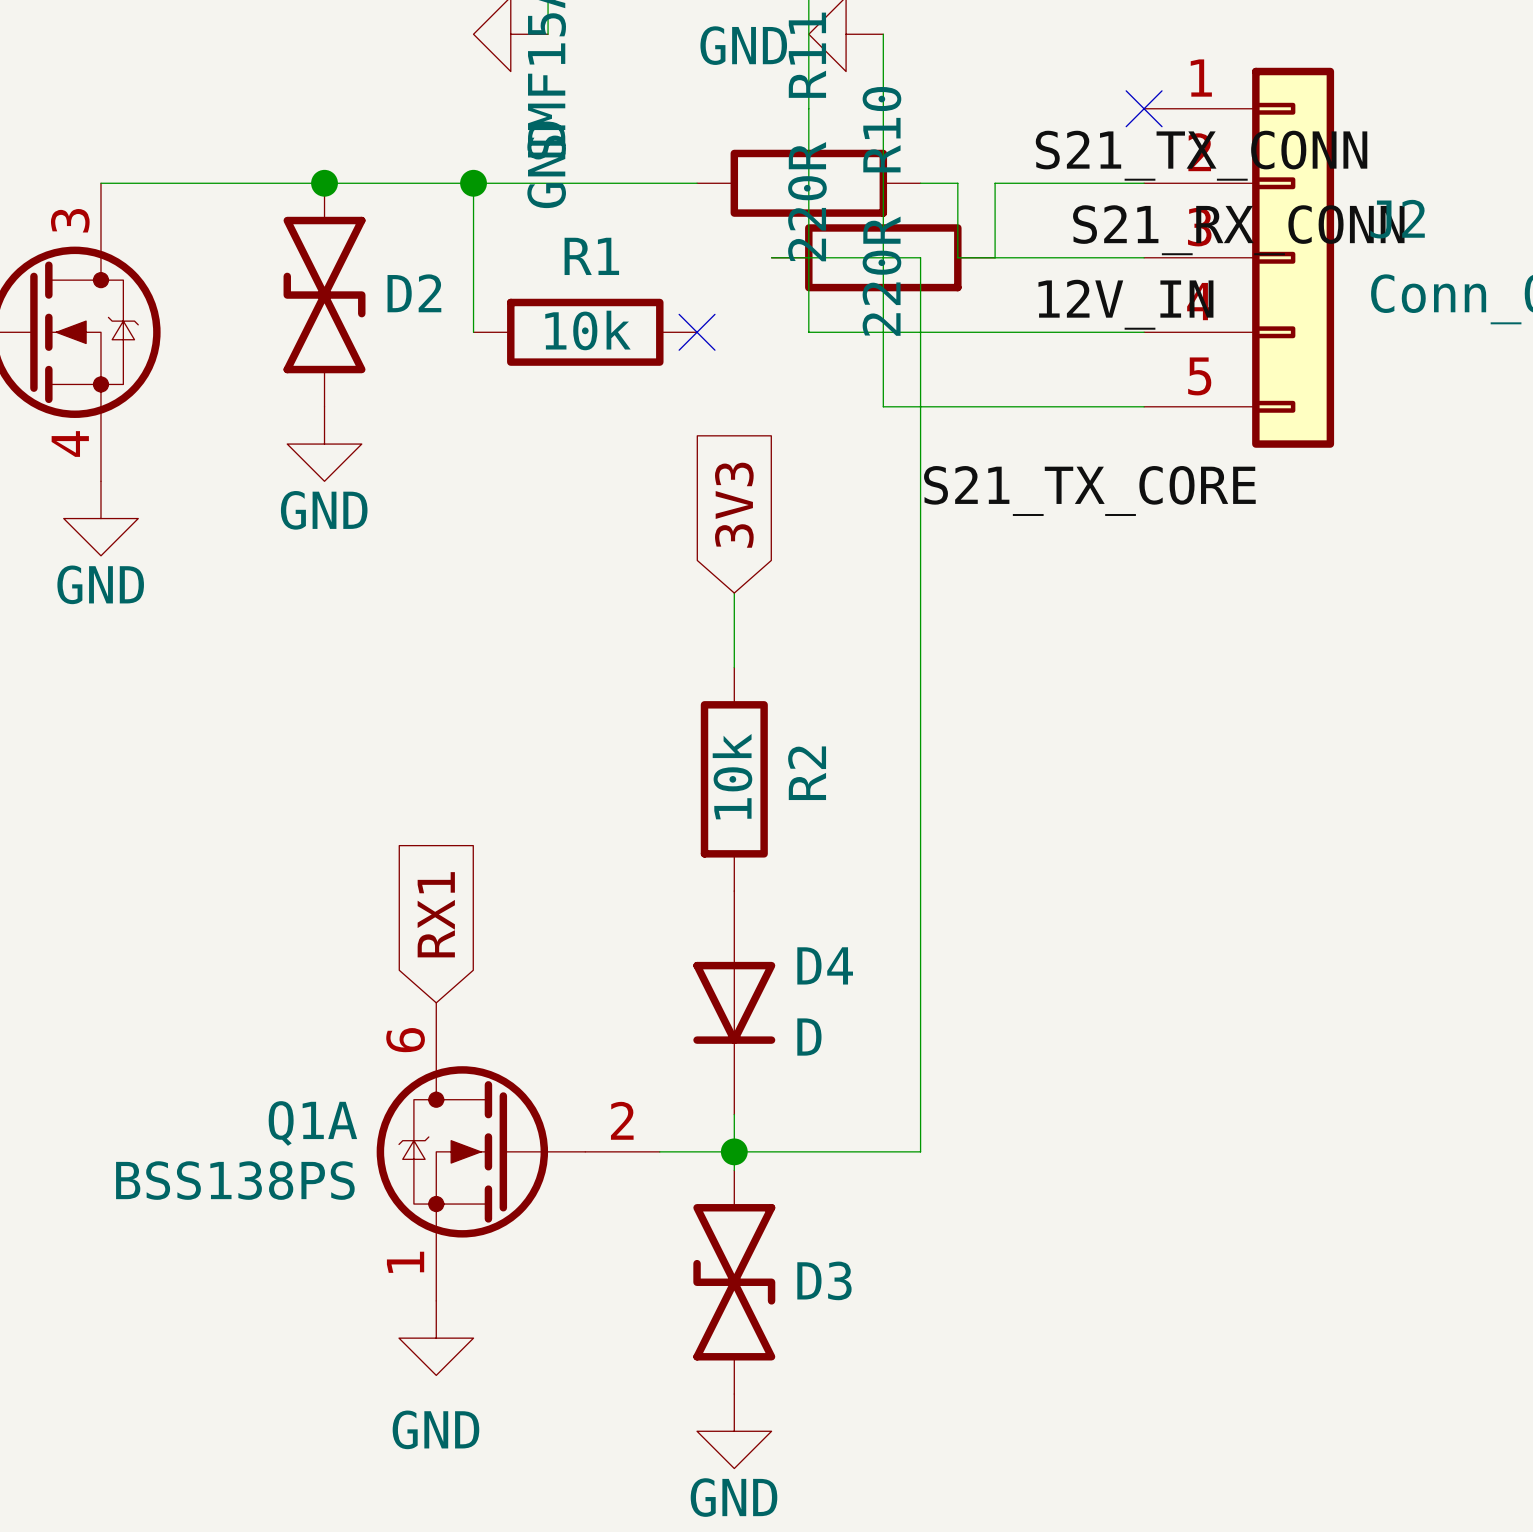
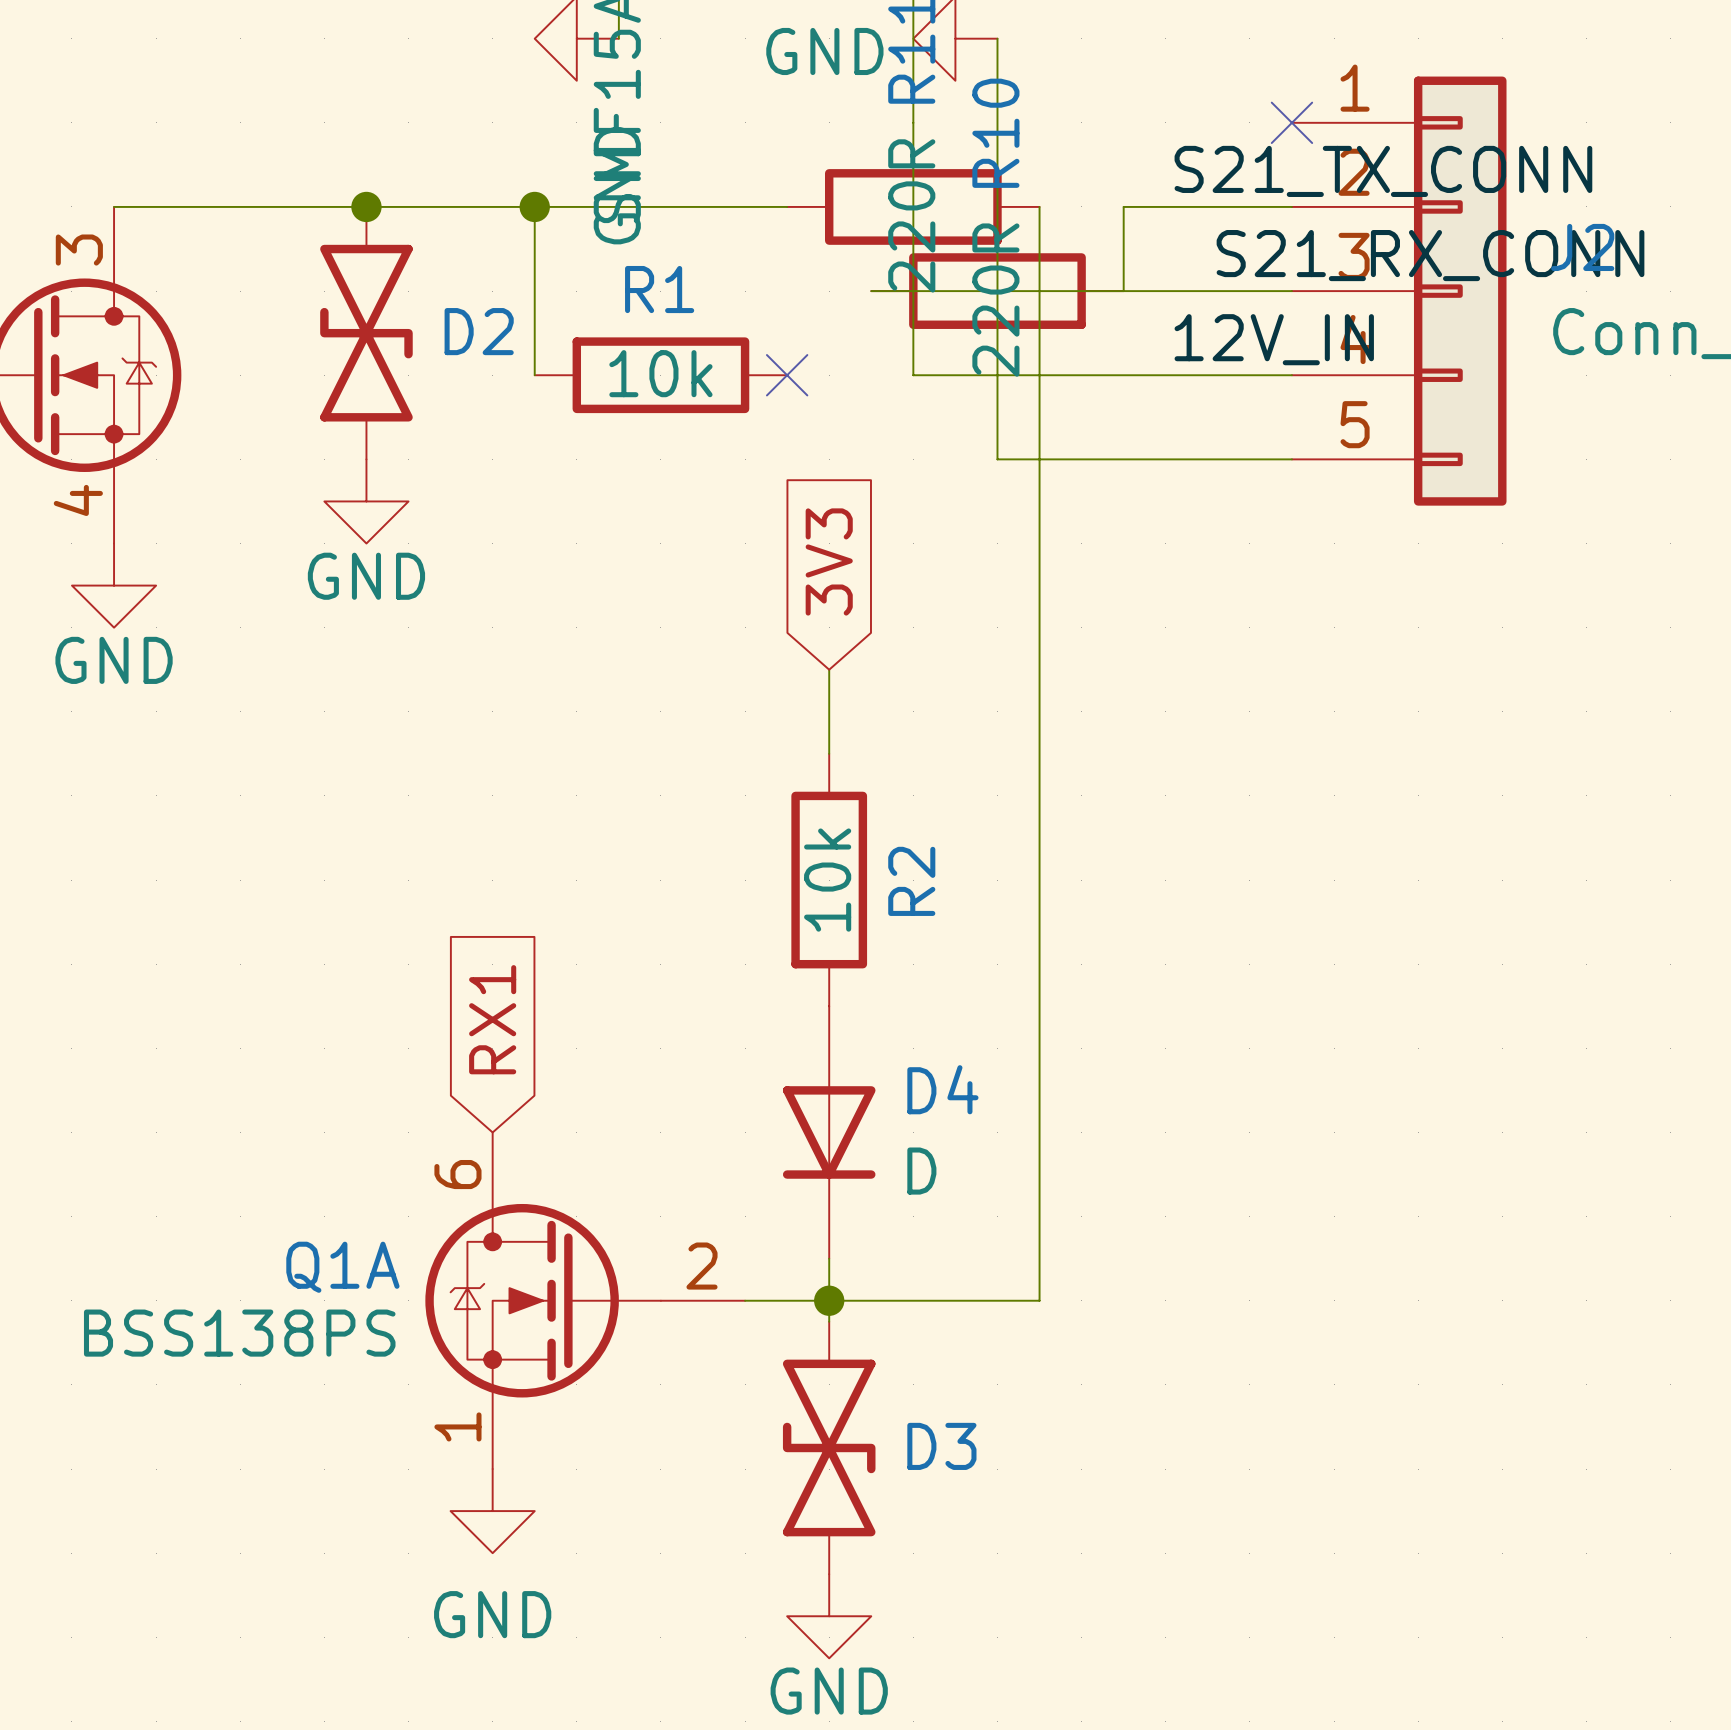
wire: (920, 183) (957, 183) (957, 257) -> (1039, 206) (1039, 291) (1081, 291)
label: S21_TX_CORE (1089, 491) -> none

